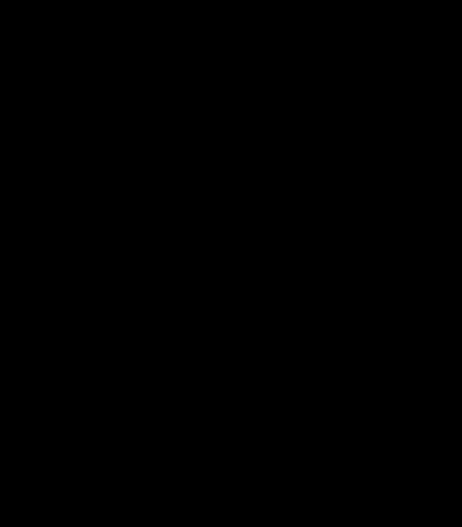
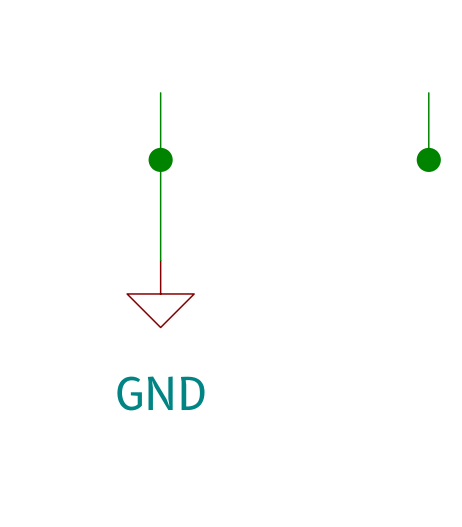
wire: none -> (160, 92) (160, 260)
wire: none -> (428, 92) (428, 159)
junction: none -> (160, 159)
junction: none -> (428, 159)
power symbol: none -> GND (160, 293)

